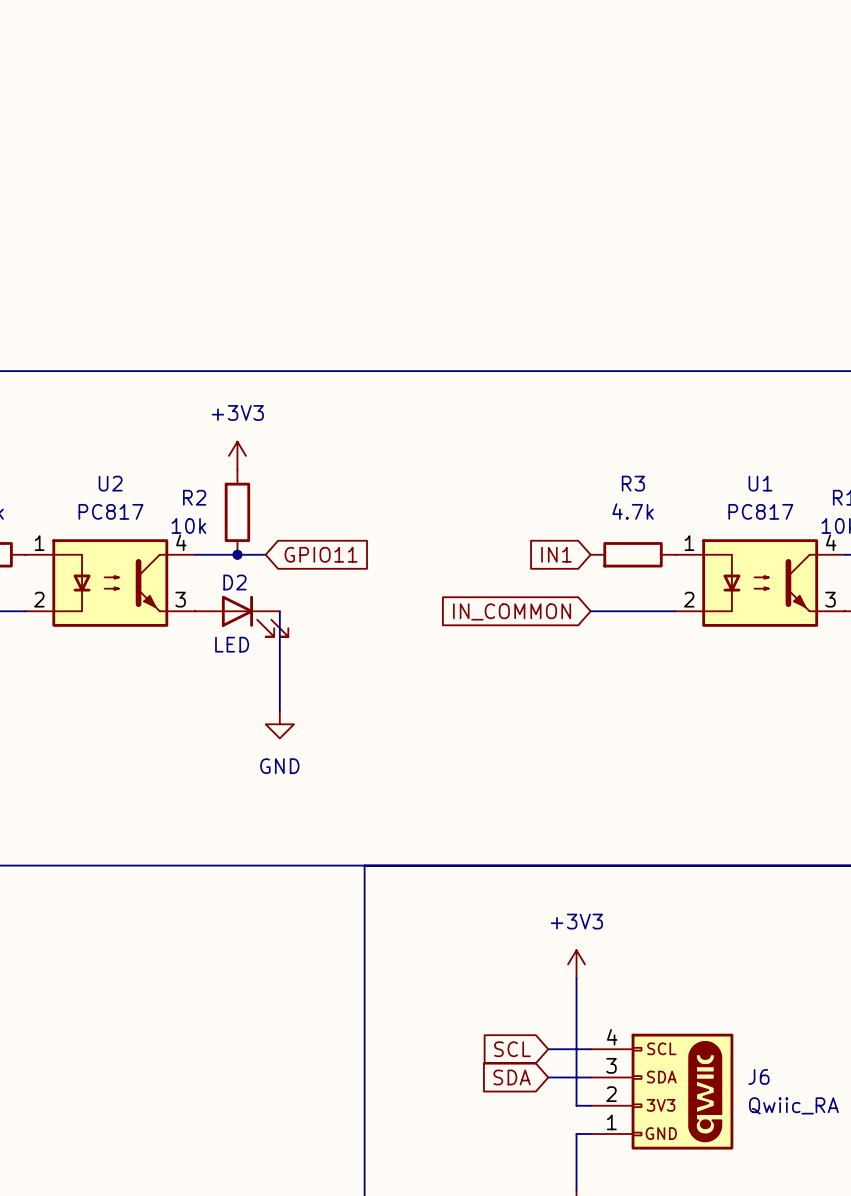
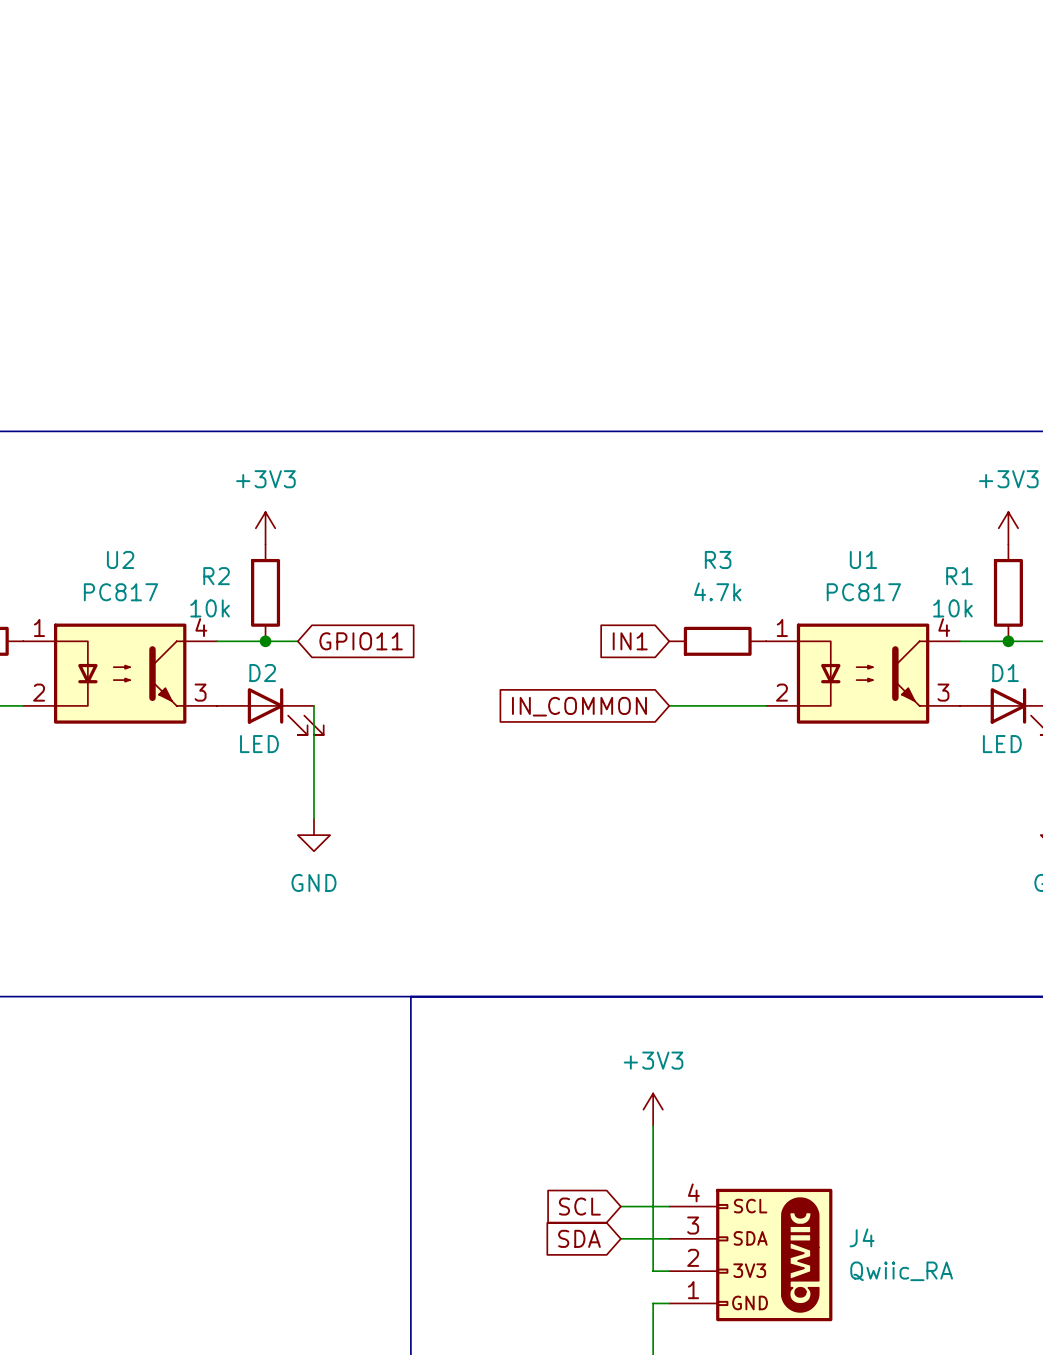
J6 name: J6 (758, 1076) -> J4 (862, 1237)

